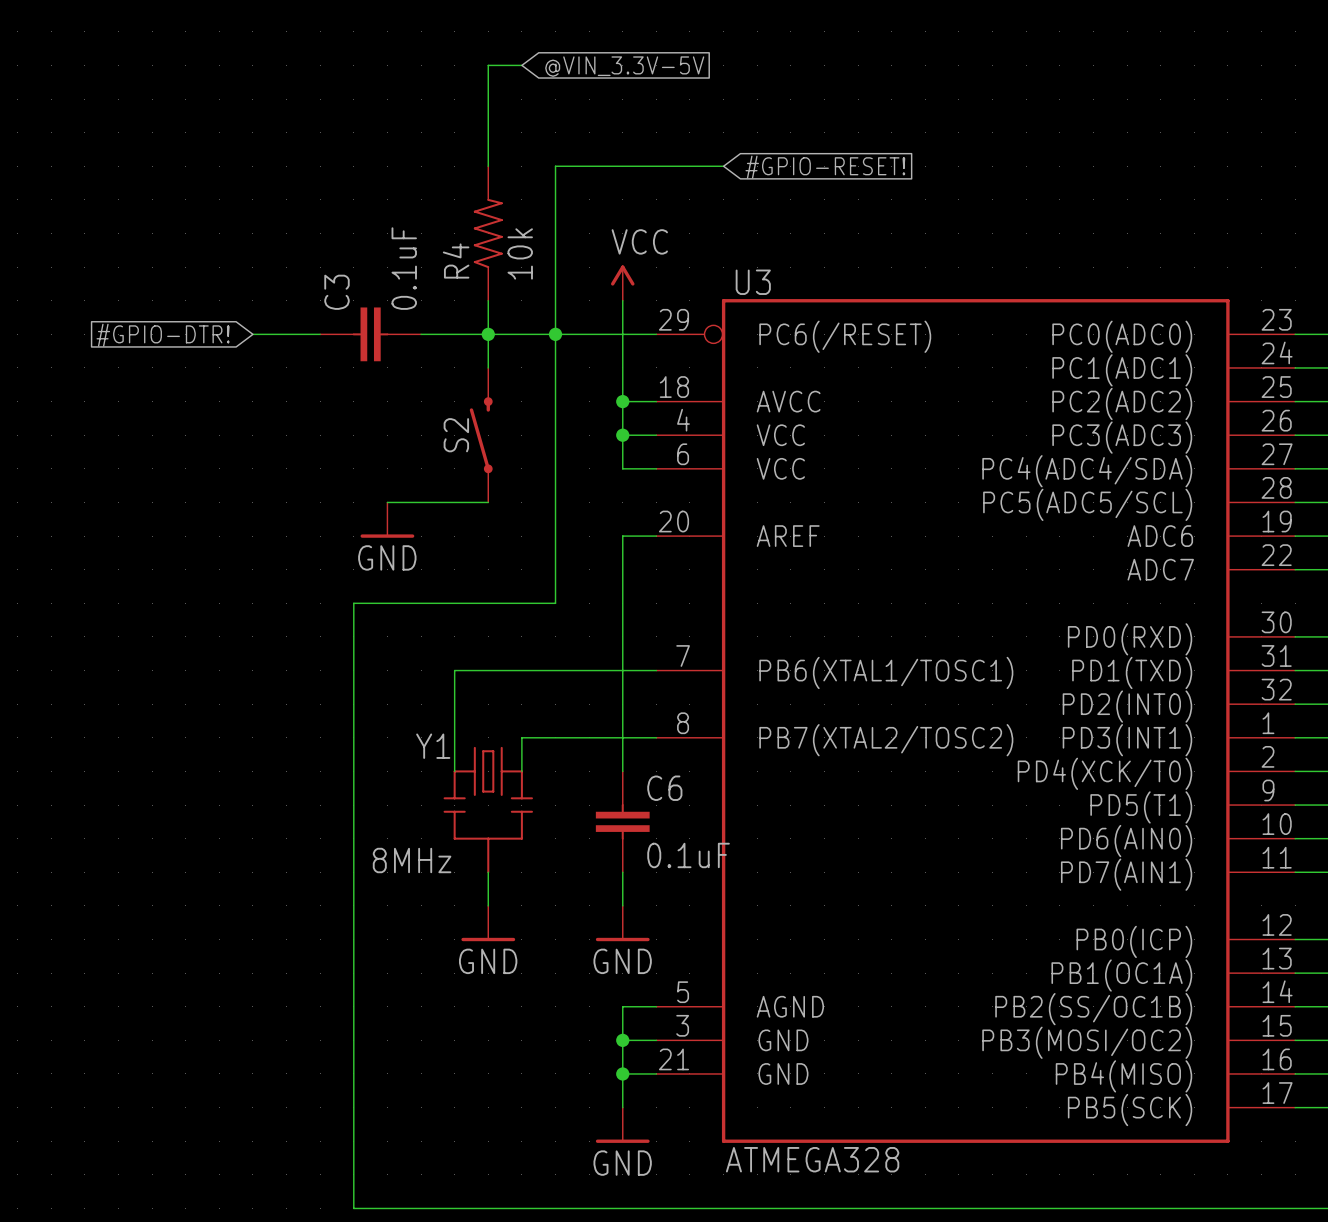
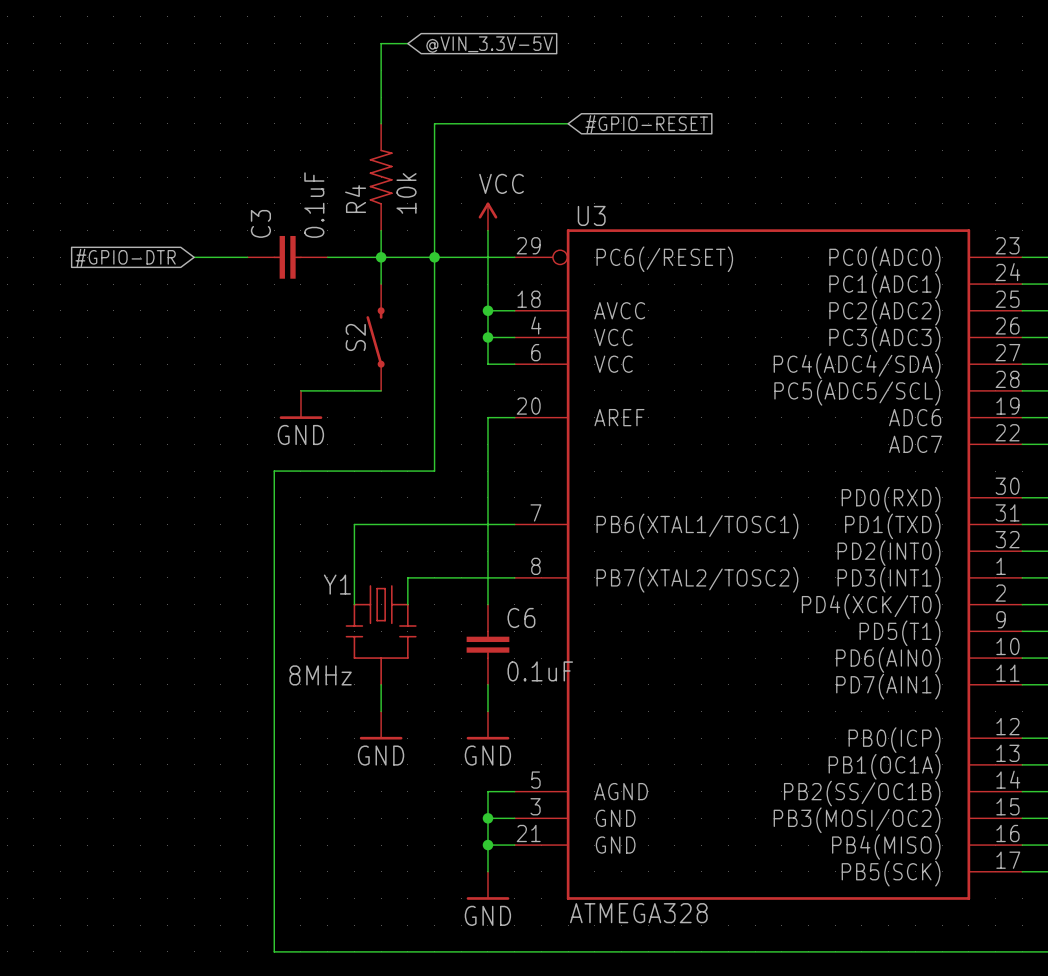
global label: #GPIO-RESET! (825, 167) -> #GPIO-RESET (646, 124)
global label: #GPIO-DTR! (163, 335) -> #GPIO-DTR (125, 257)

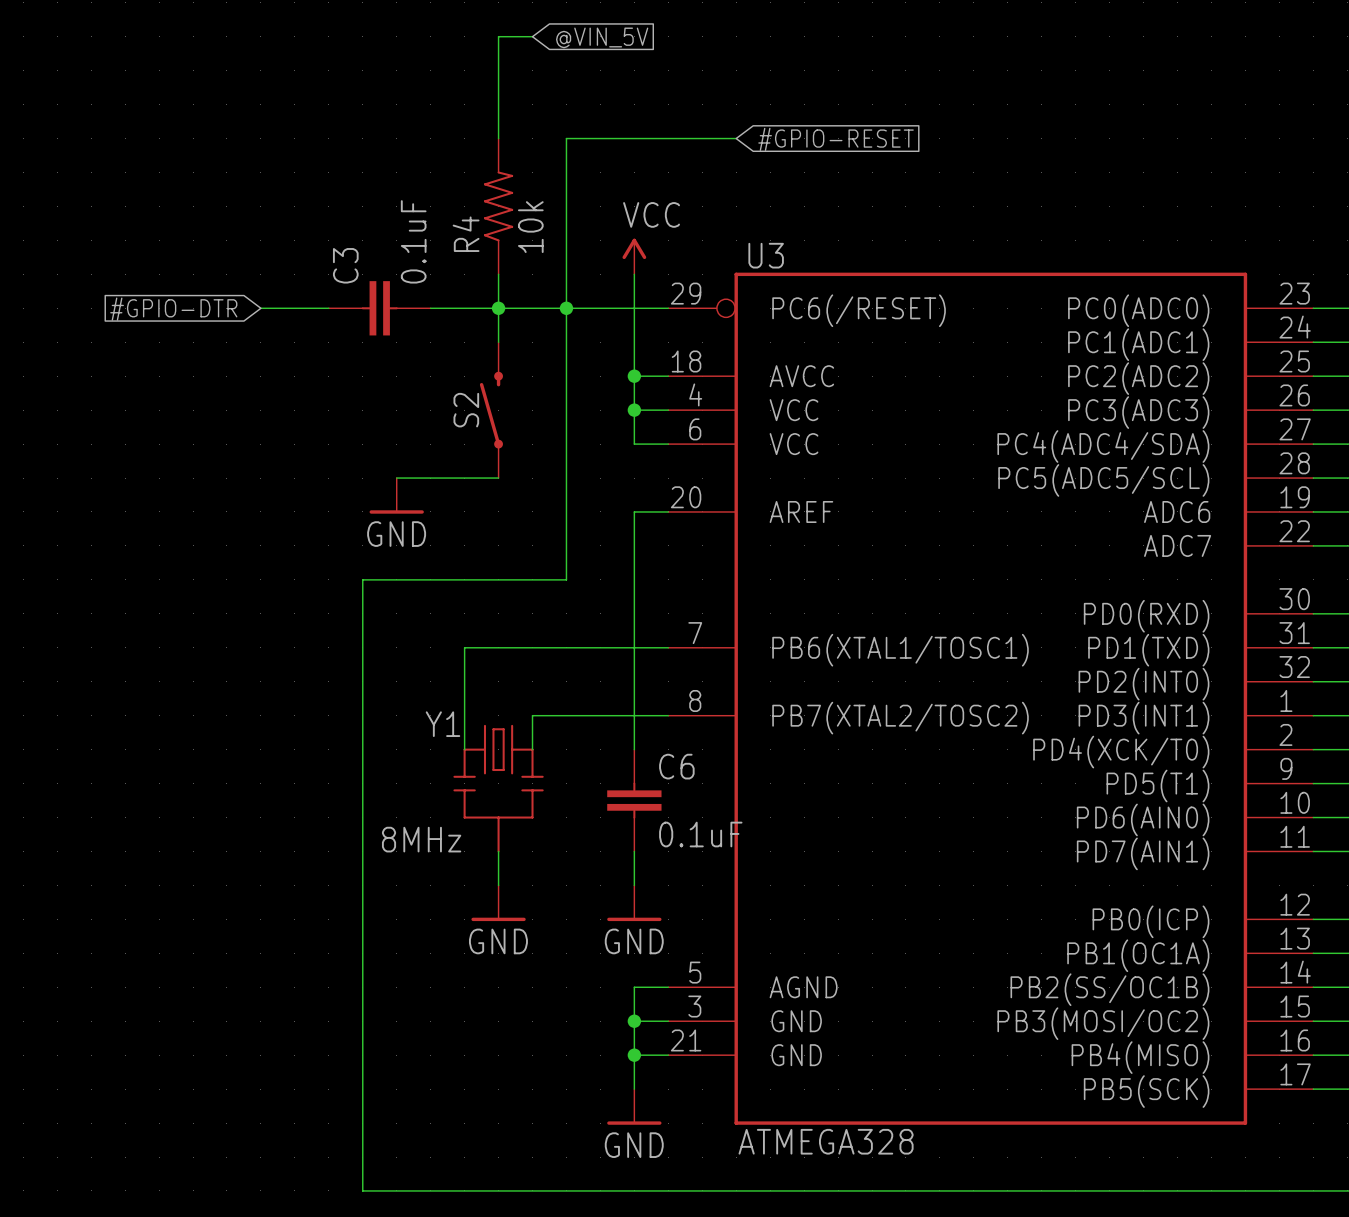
global label: @VIN_3.3V-5V (489, 44) -> @VIN_5V (602, 37)

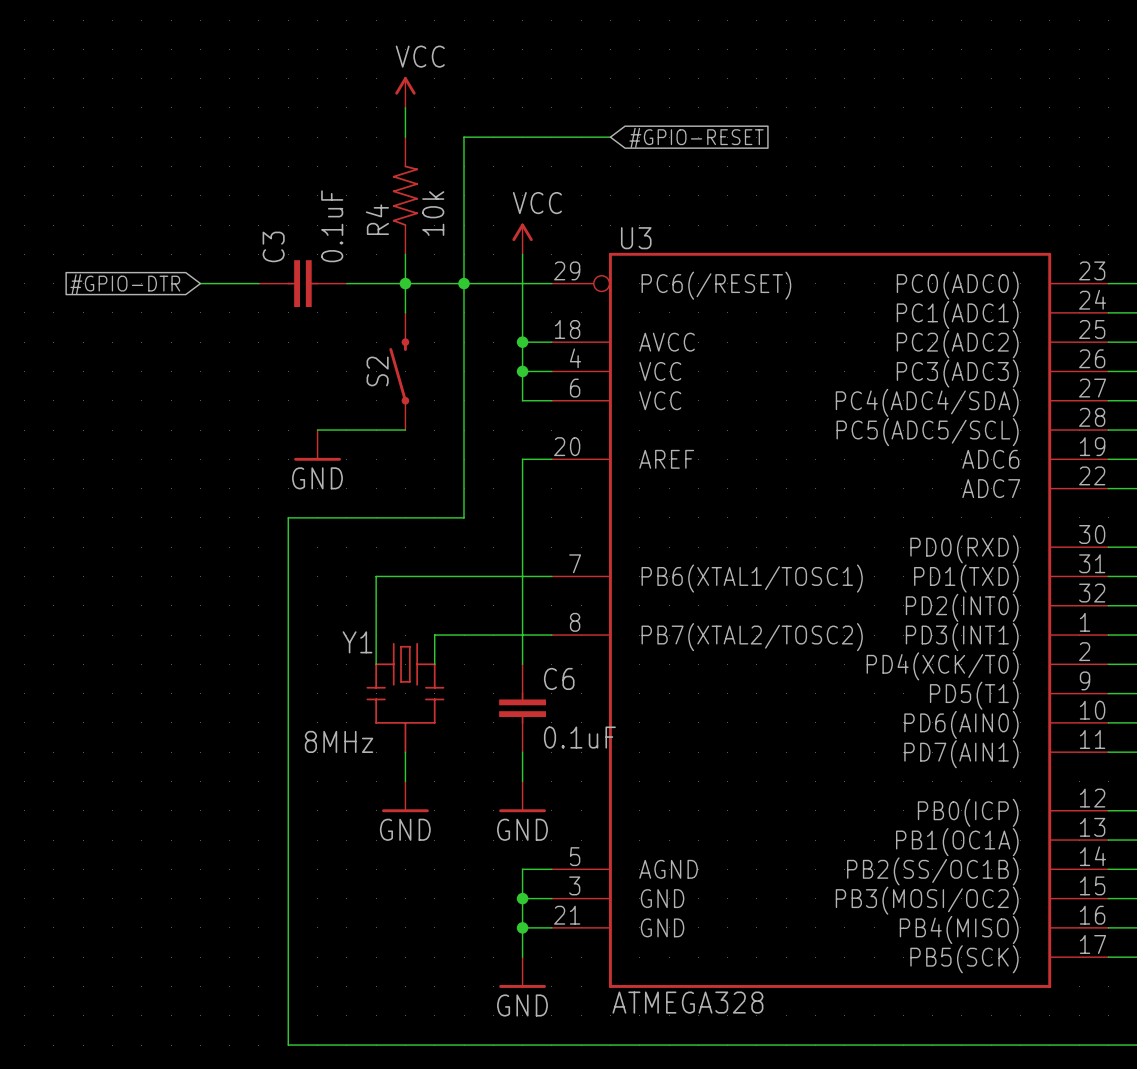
wire: (532, 36) (498, 36) (498, 104) -> none
global label: @VIN_5V (602, 37) -> none
power symbol: none -> VCC (405, 92)

